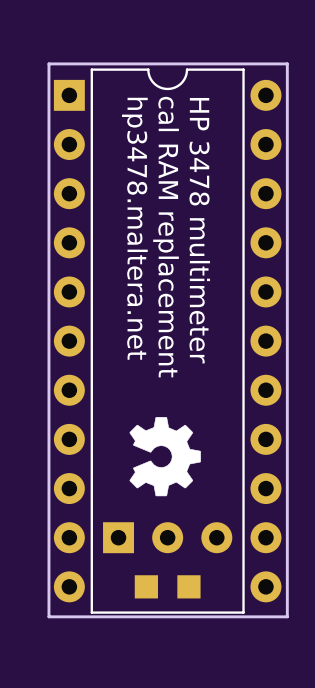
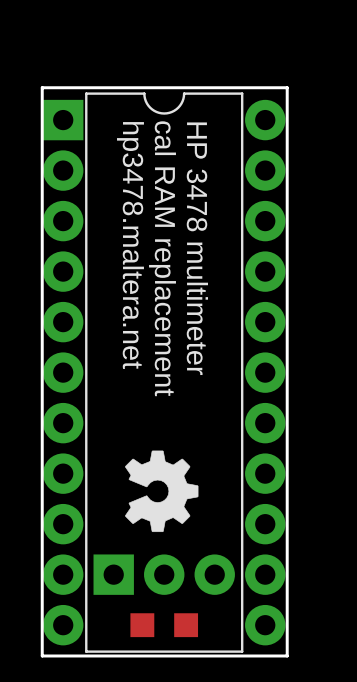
part footprint: [53, 68, 282, 614] -> [43, 92, 286, 653]
part footprint: [103, 522, 233, 554] -> [93, 554, 235, 595]

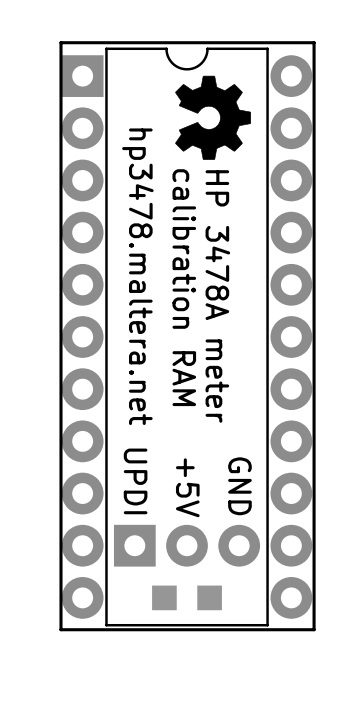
text position: hp3478.maltera.net (130, 245) -> hp3478.maltera.net (137, 276)
text: HP 3478 multimeter (197, 248) -> HP 3478A meter (217, 296)
text: cal RAM replacement (162, 258) -> none
text: none -> calibration RAM (184, 287)
drawing position: (161, 491) -> (213, 117)
text: none -> UPDI (135, 481)
text: none -> GND (239, 486)
text: none -> +5V (187, 487)

